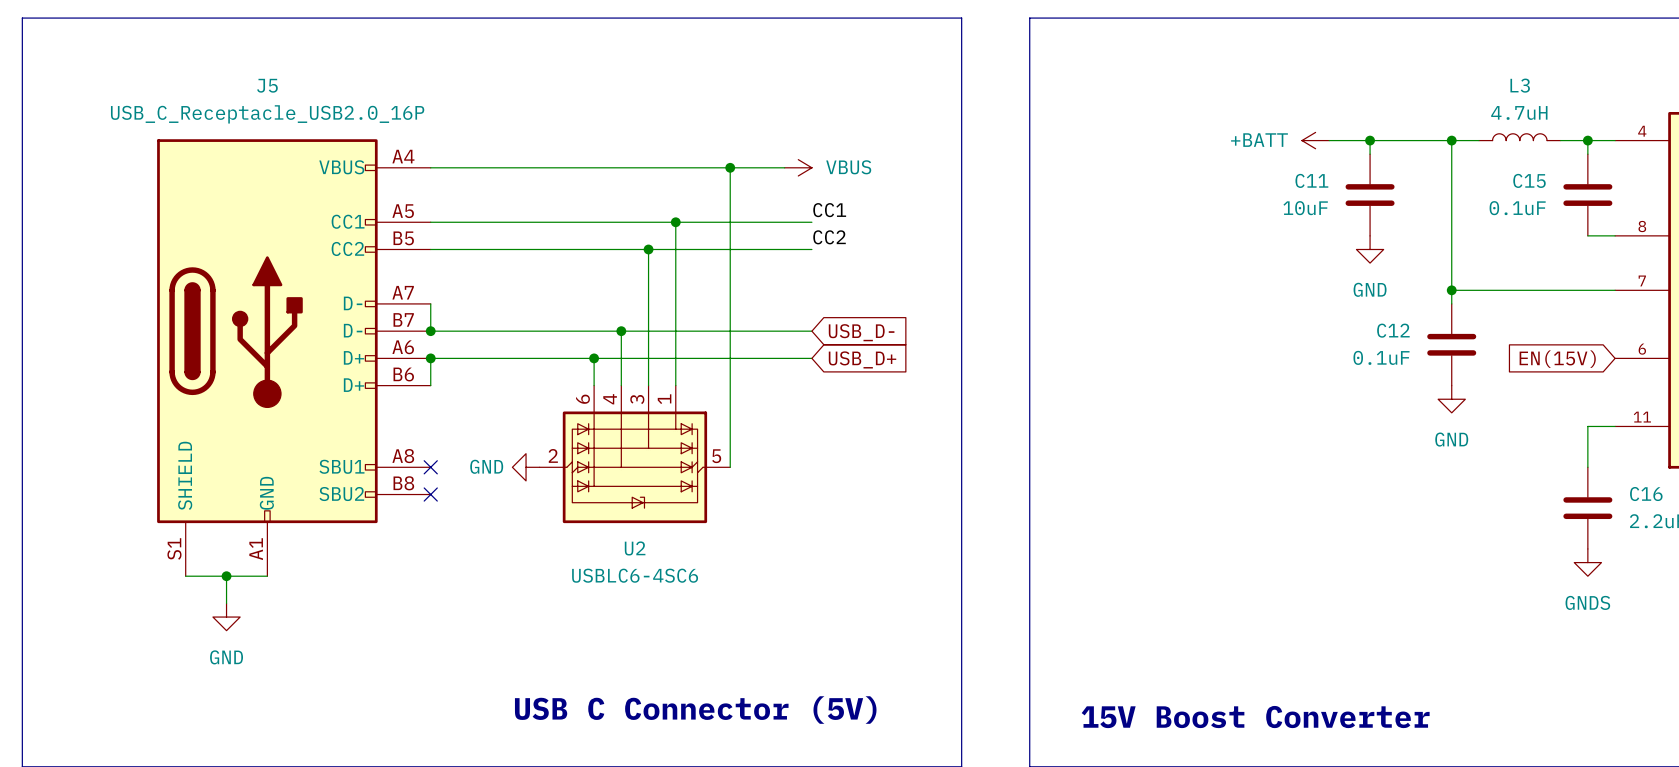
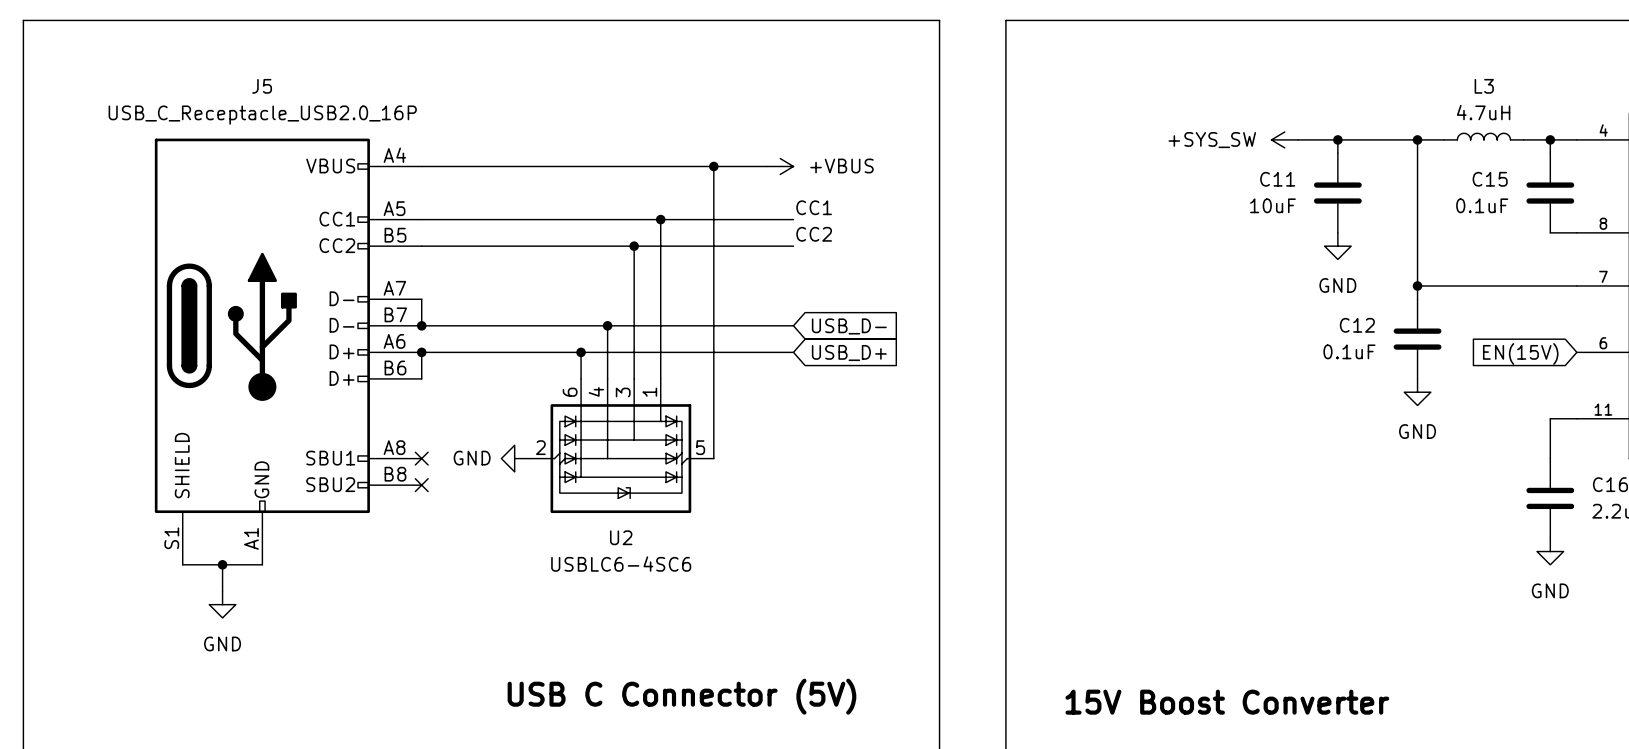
power symbol: +BATT (1315, 140) -> +SYS_SW (1284, 139)
power symbol: VBUS (798, 167) -> +VBUS (780, 166)
power symbol: GNDS (1587, 562) -> GND (1550, 551)

